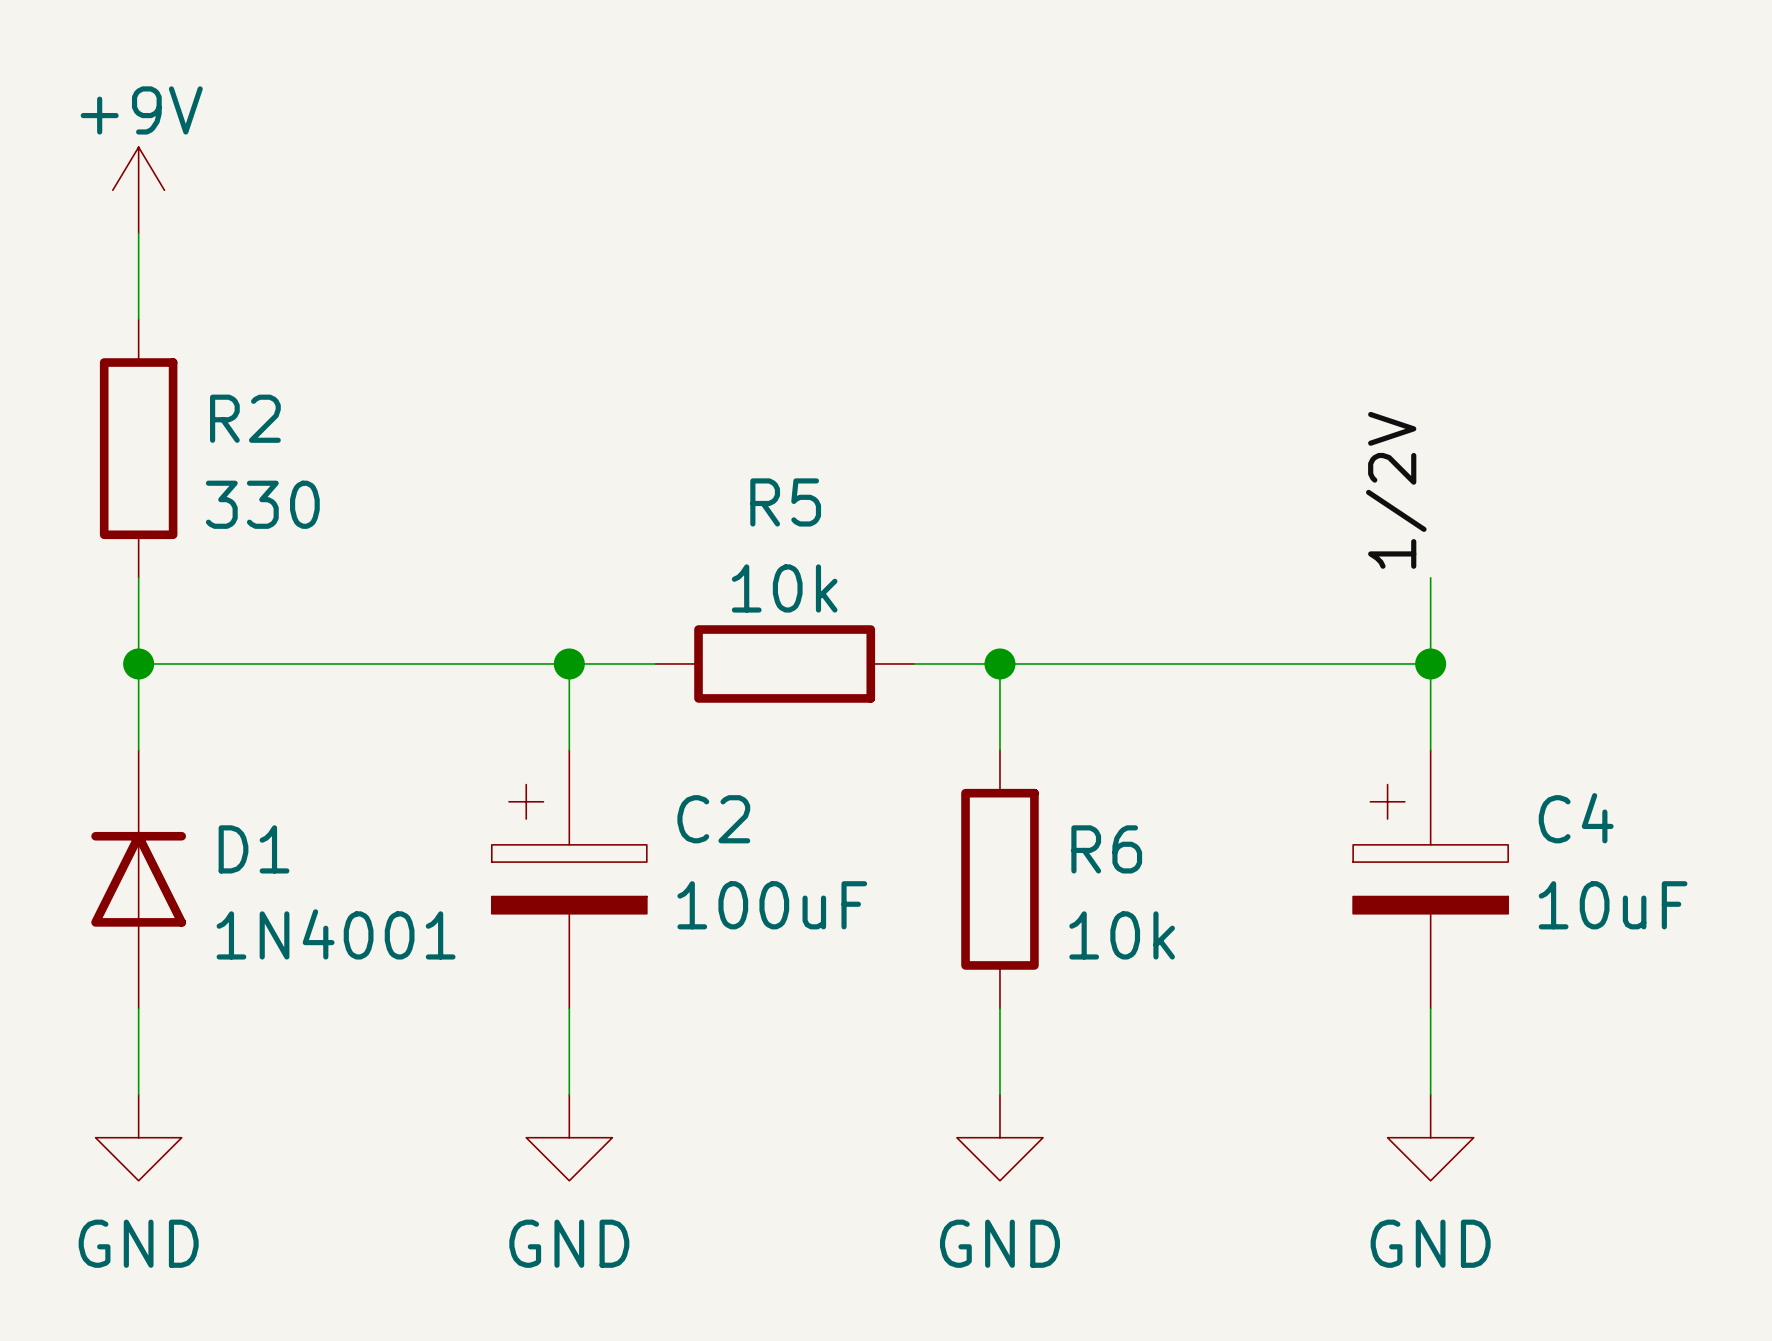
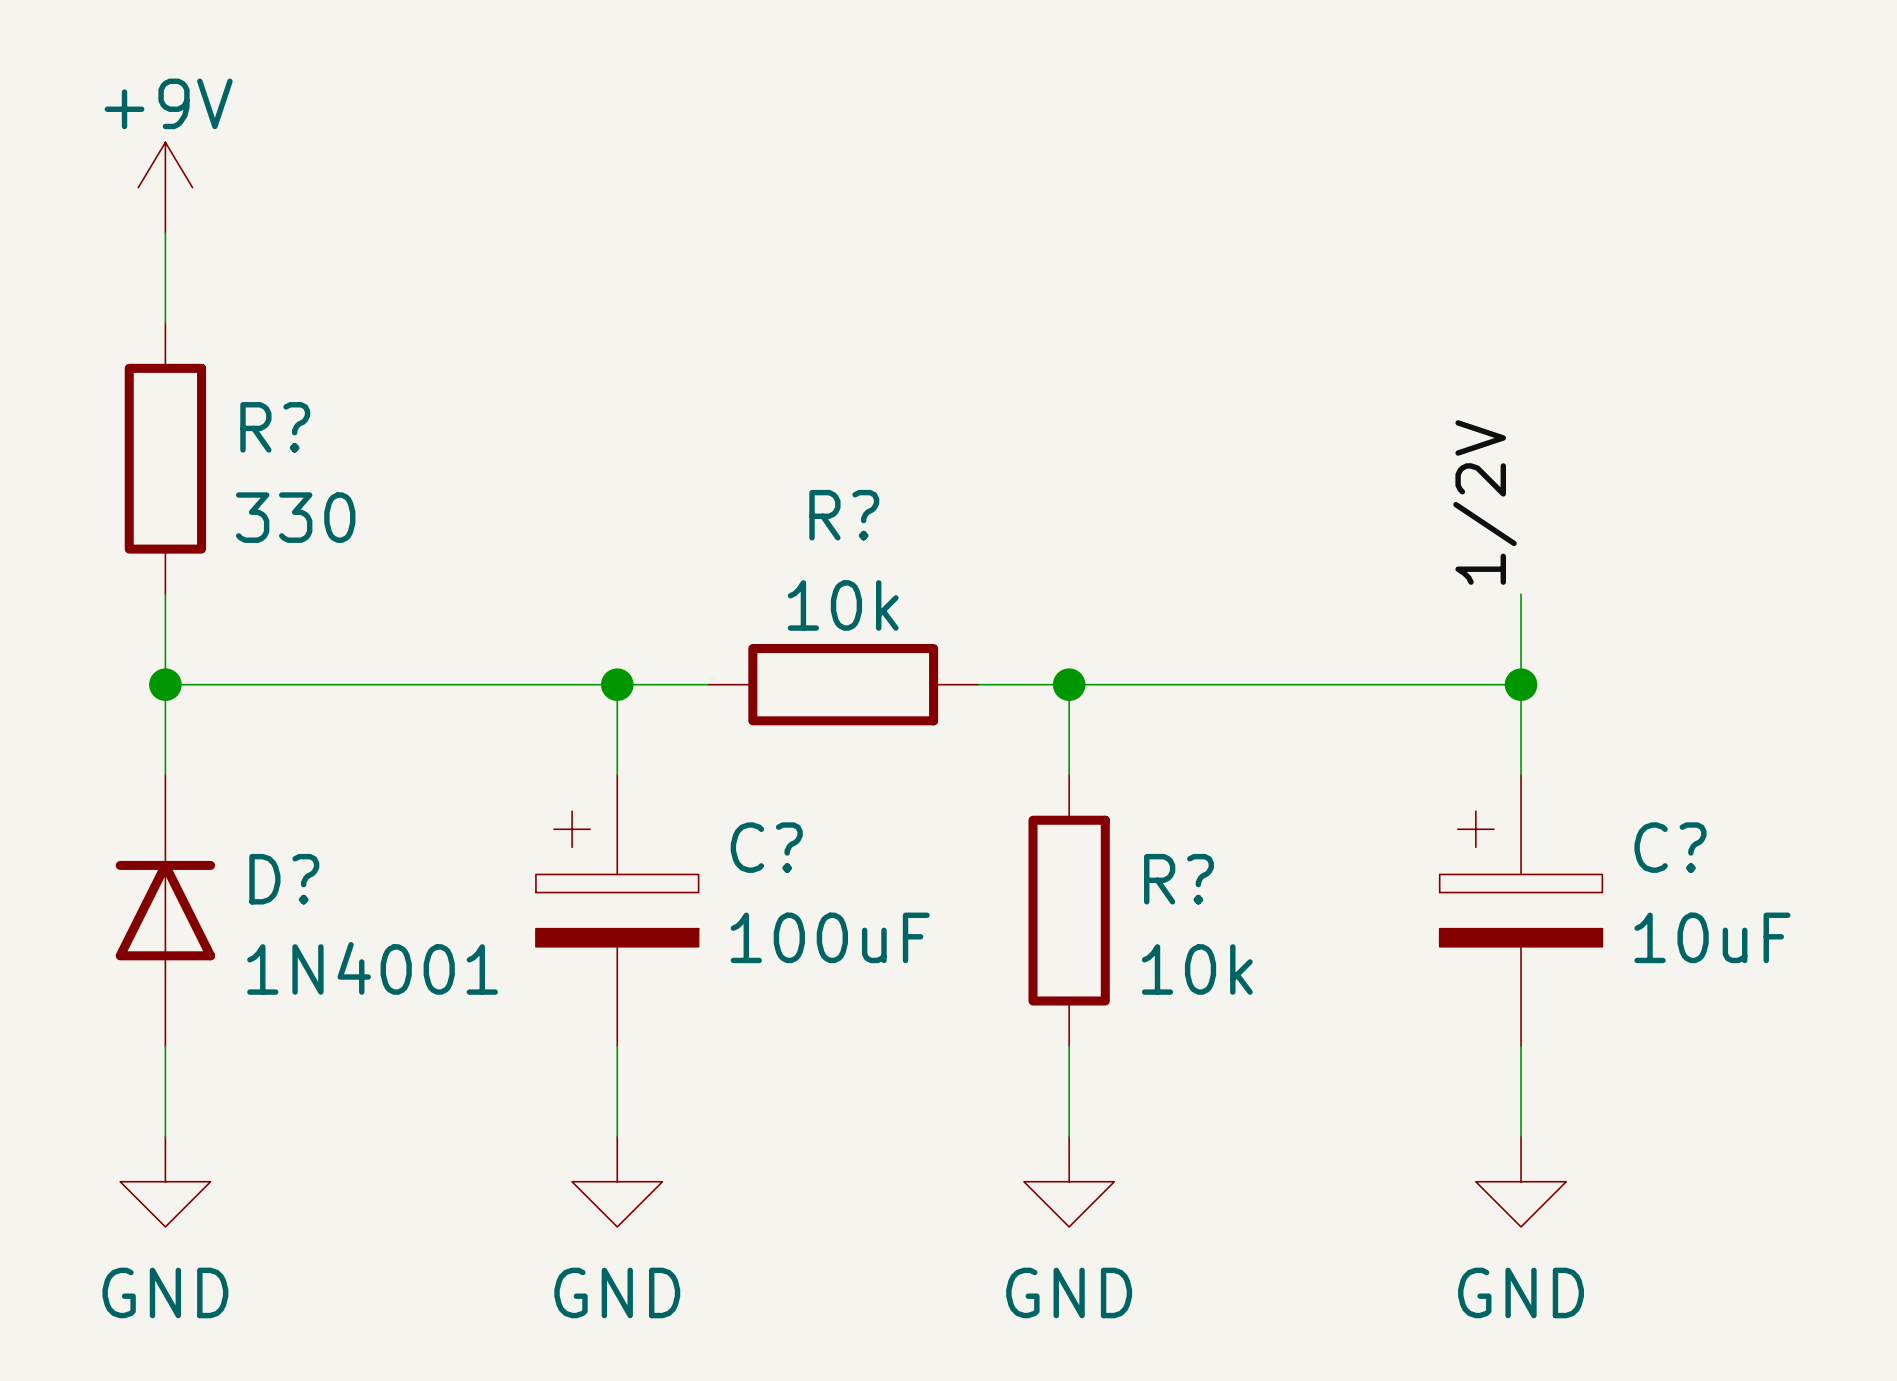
R2 name: R2 (245, 418) -> R? (275, 427)
R5 name: R5 (785, 502) -> R? (844, 515)
C4 name: C4 (1576, 818) -> C? (1670, 847)
C2 name: C2 (713, 819) -> C? (766, 847)
D1 name: D1 (254, 849) -> D? (284, 879)
R6 name: R6 (1106, 849) -> R? (1179, 879)

